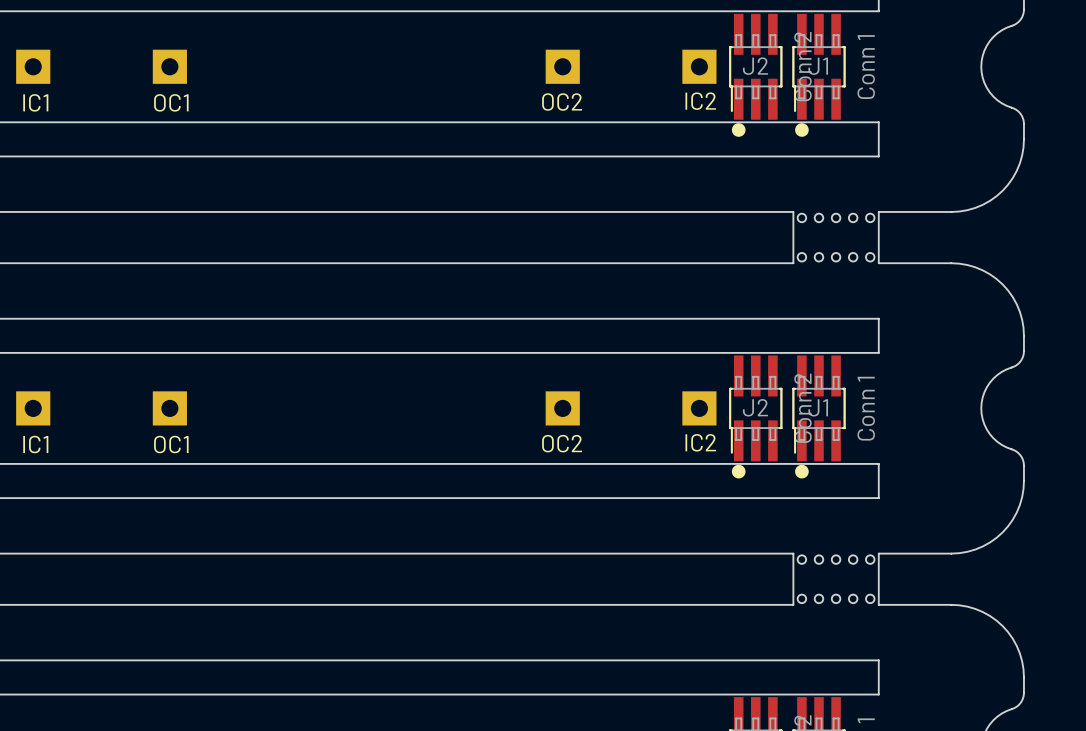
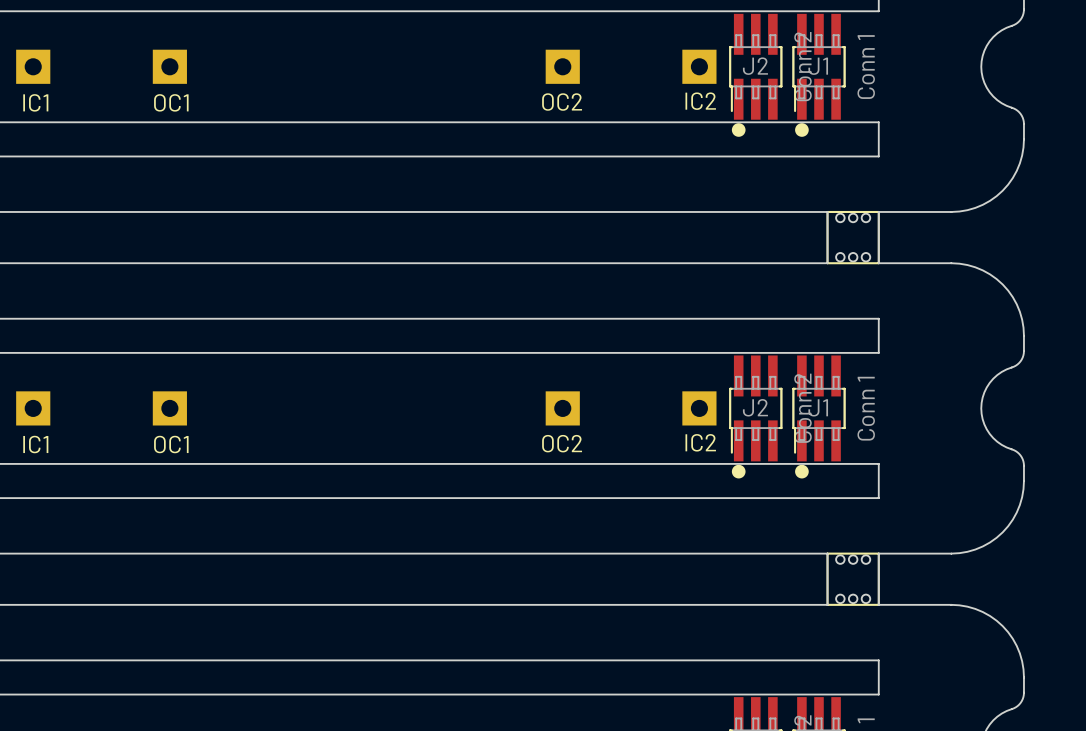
board edge: (793, 211) (793, 263) -> (793, 211) (827, 211) (827, 263) (793, 263)
part footprint: [797, 213, 875, 262] -> [826, 210, 880, 265]
board edge: (793, 553) (793, 604) -> (793, 553) (827, 553) (827, 604) (793, 604)
part footprint: [797, 555, 875, 604] -> [826, 552, 880, 606]

